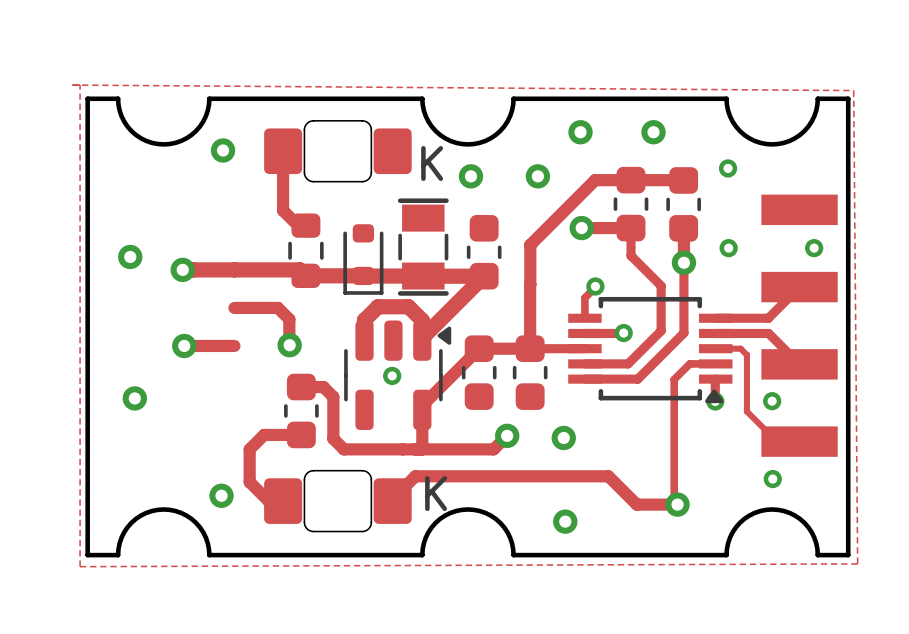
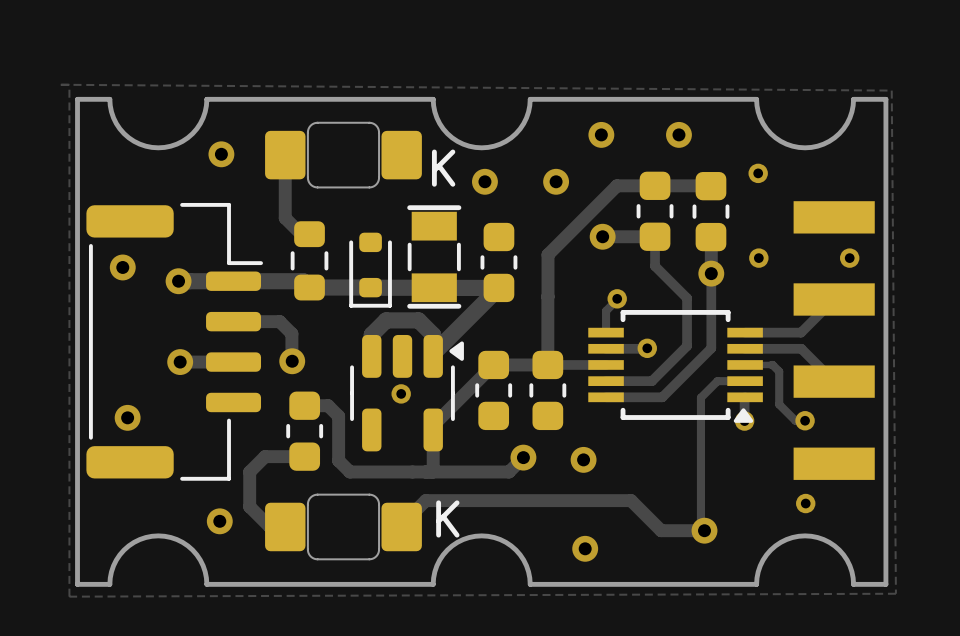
part: none -> (174, 341)
track: (740, 348) (746, 354) (746, 411) (777, 441) -> (771, 364) (779, 371) (779, 404) (795, 420) (805, 420)

